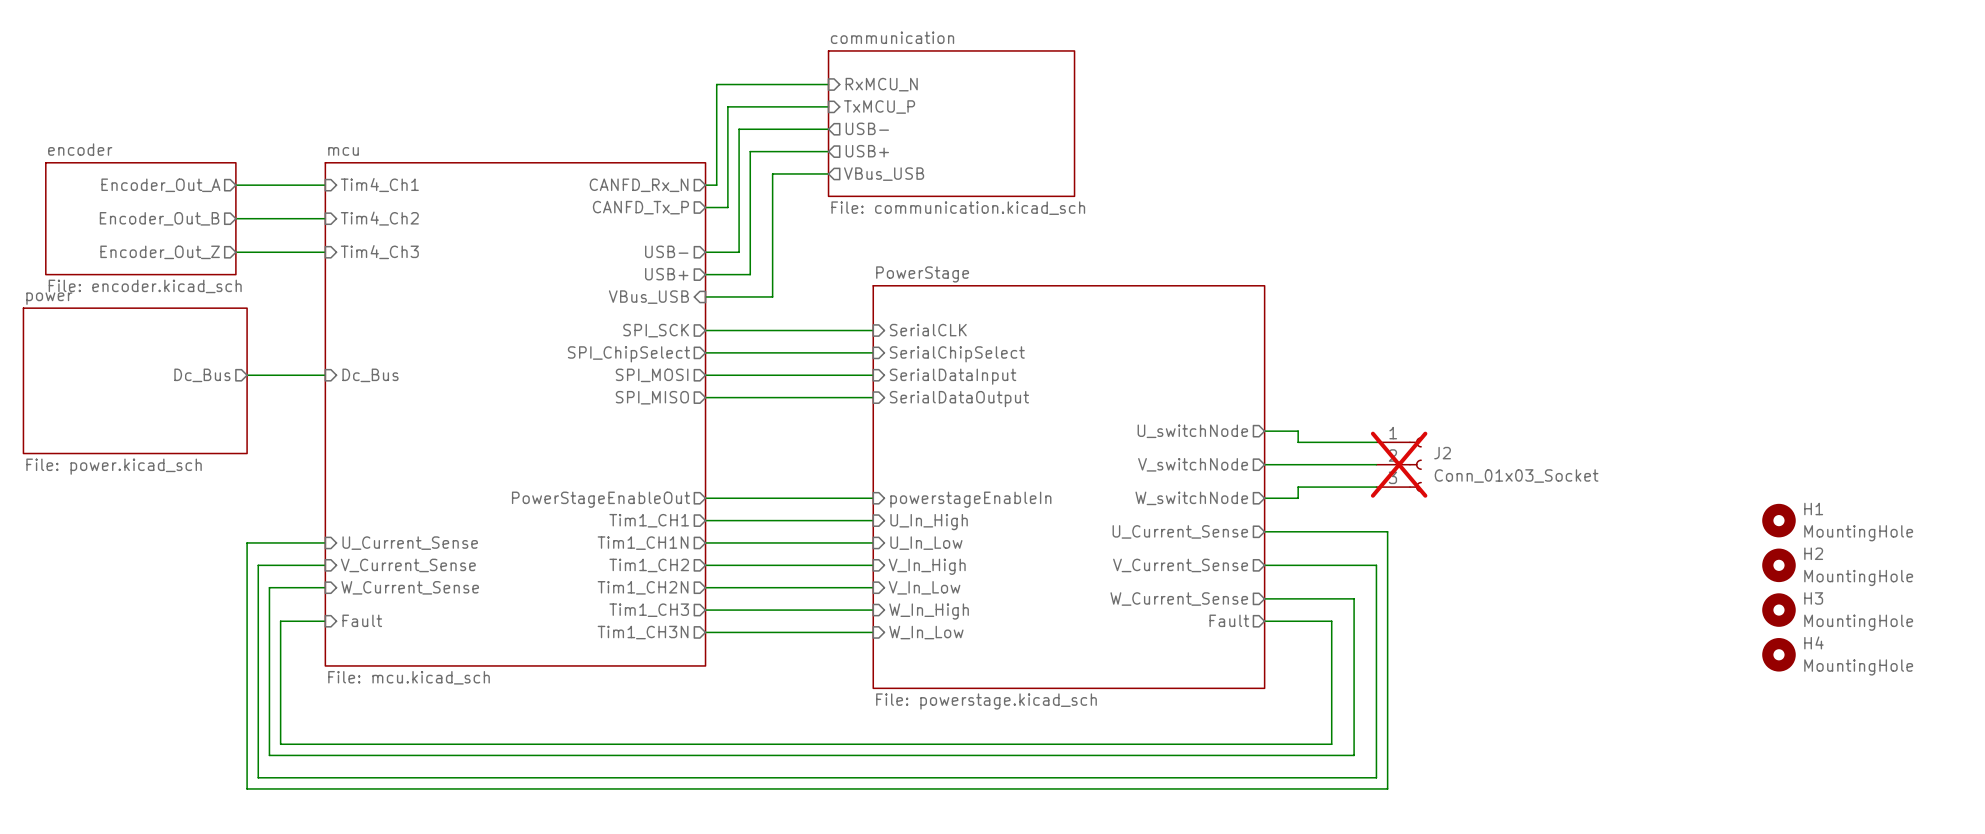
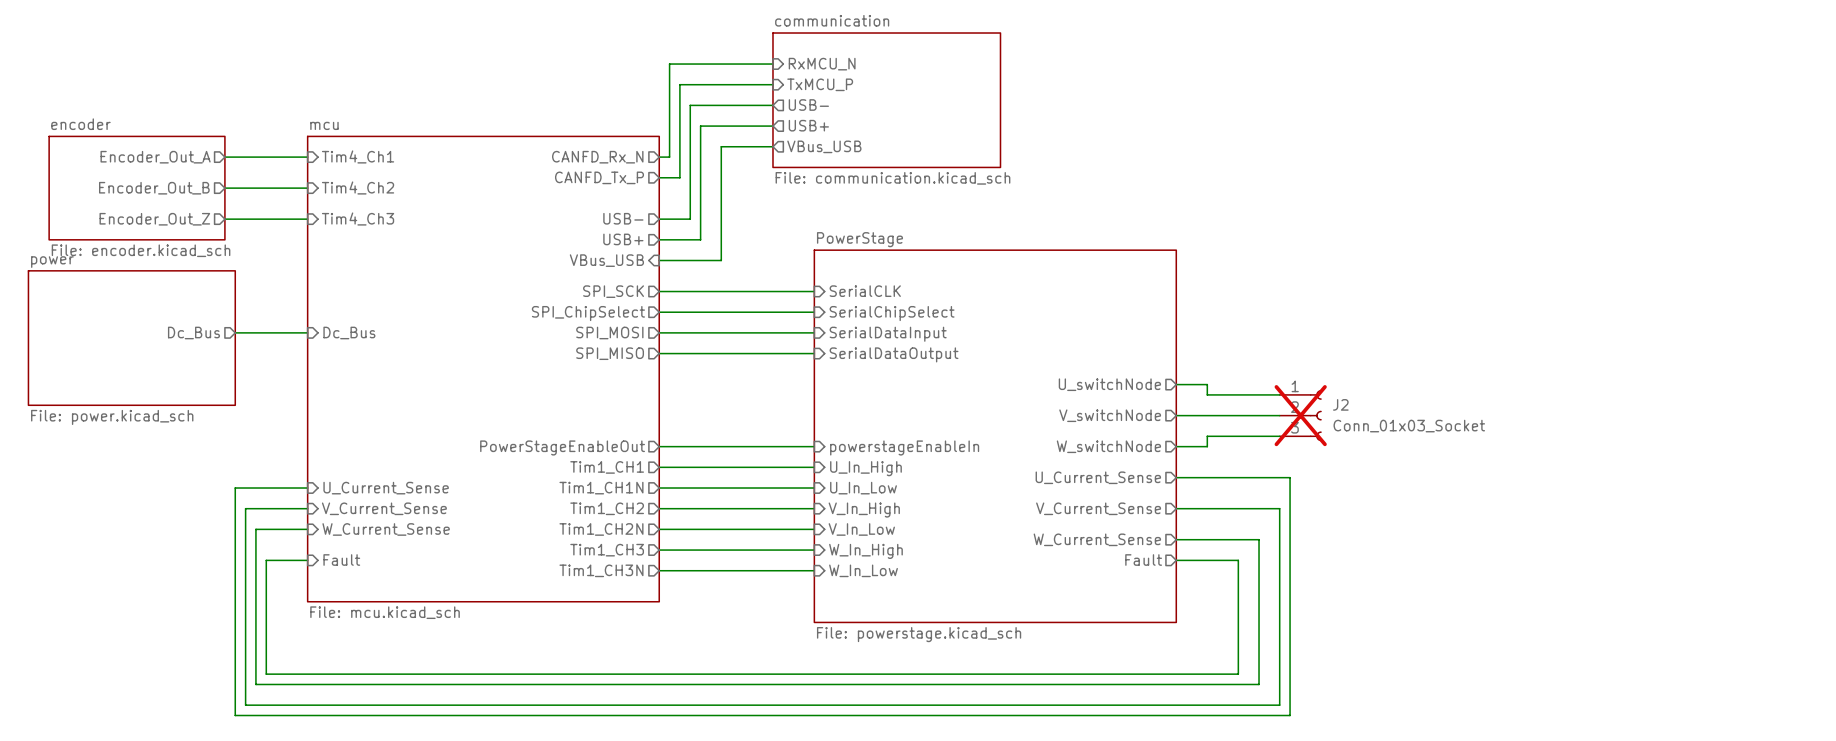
H1: MountingHole (1778, 520) -> none
H2: MountingHole (1778, 565) -> none
H3: MountingHole (1778, 610) -> none
H4: MountingHole (1778, 654) -> none

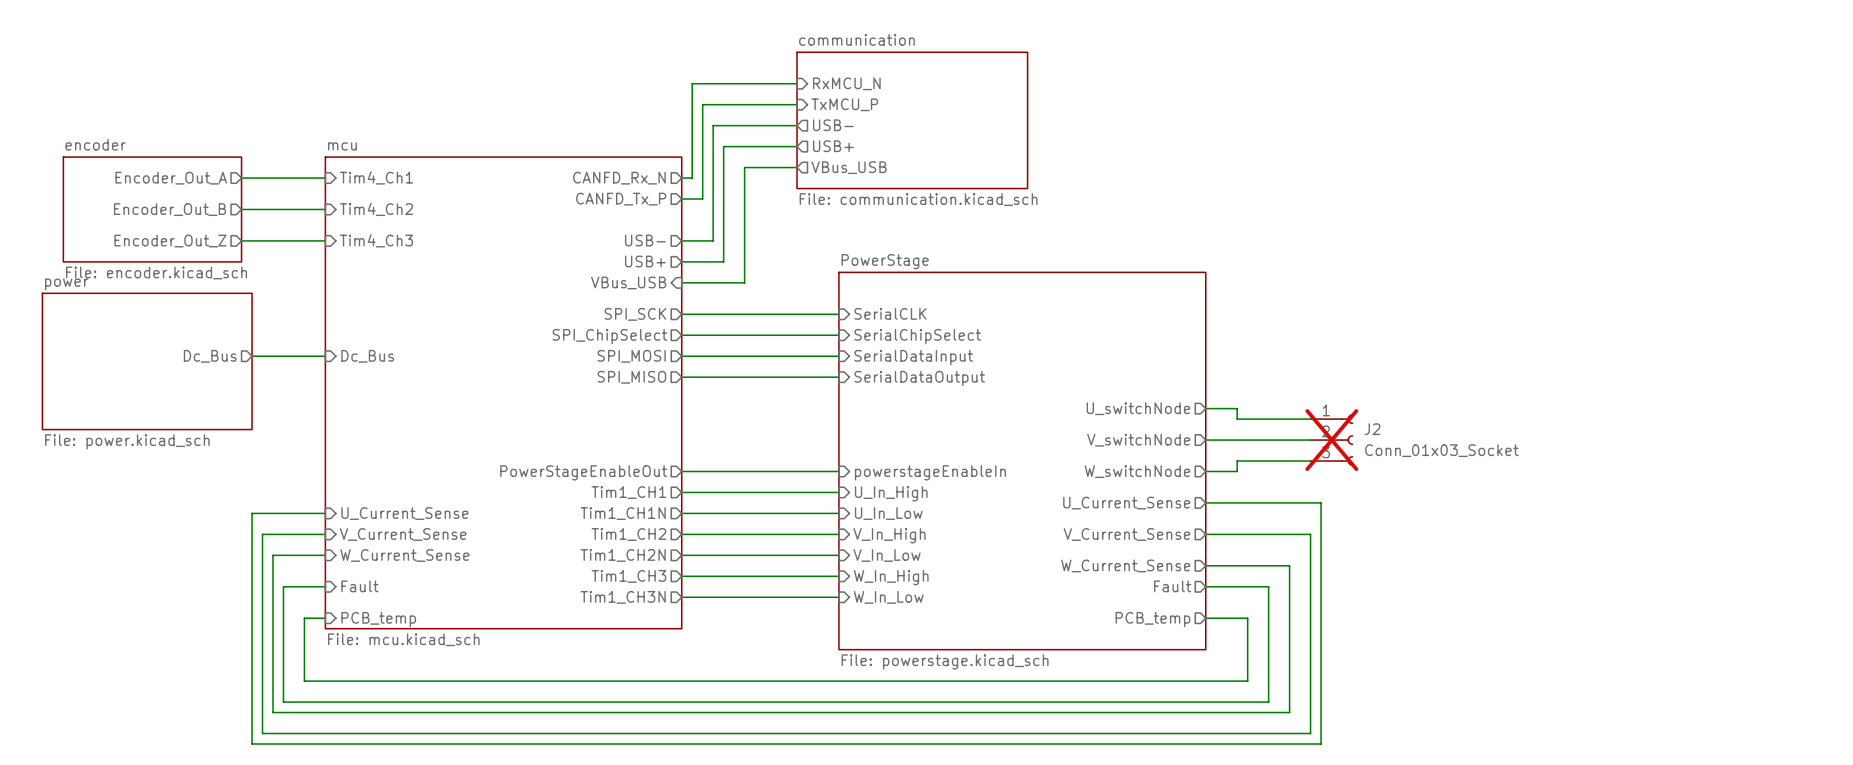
wire: none -> (325, 618) (304, 618) (304, 681) (1247, 681) (1247, 618) (1205, 618)
sheet pin: none -> PCB_temp (378, 619)
sheet pin: none -> PCB_temp (1152, 619)

